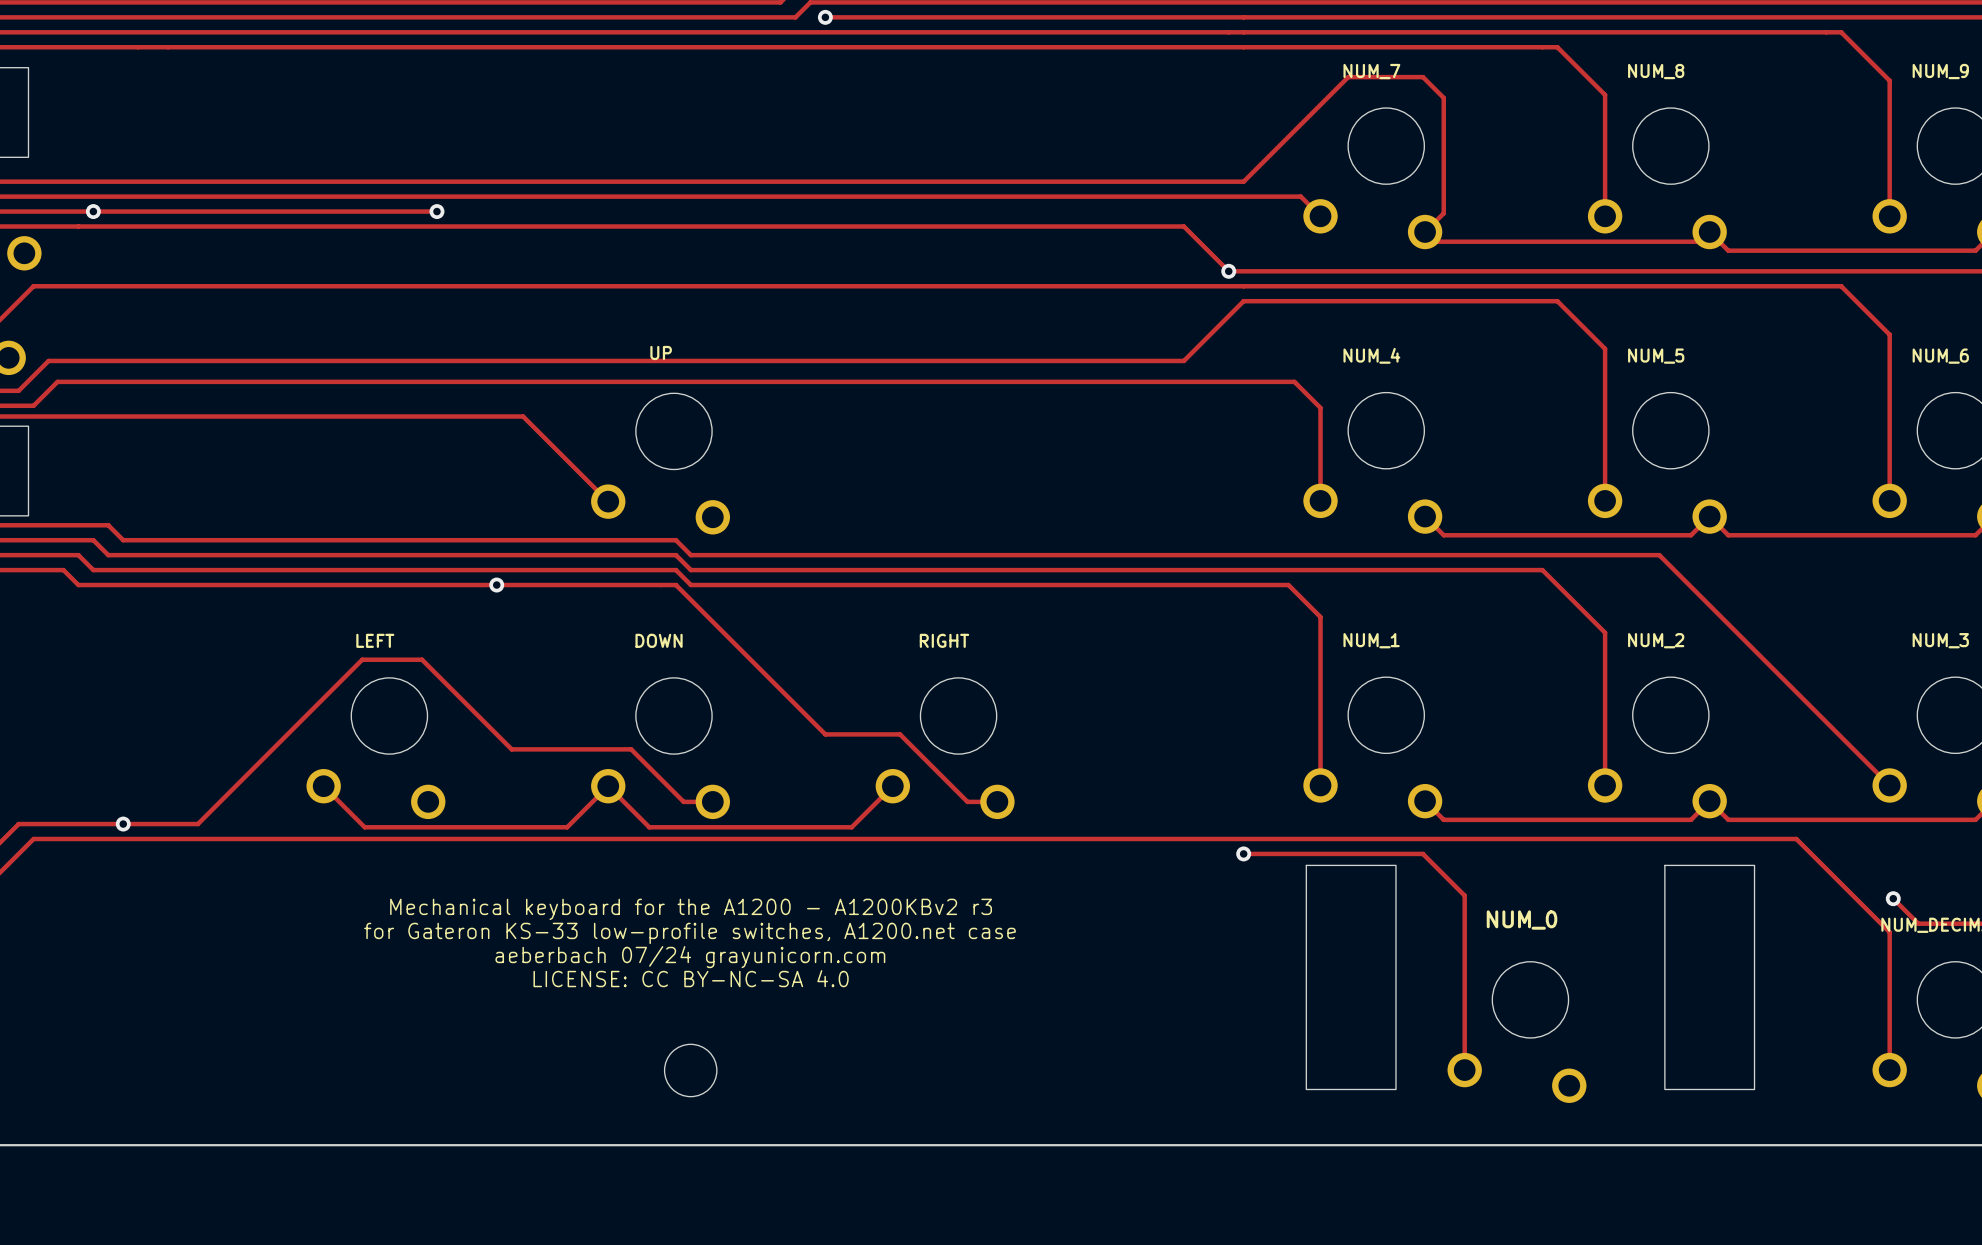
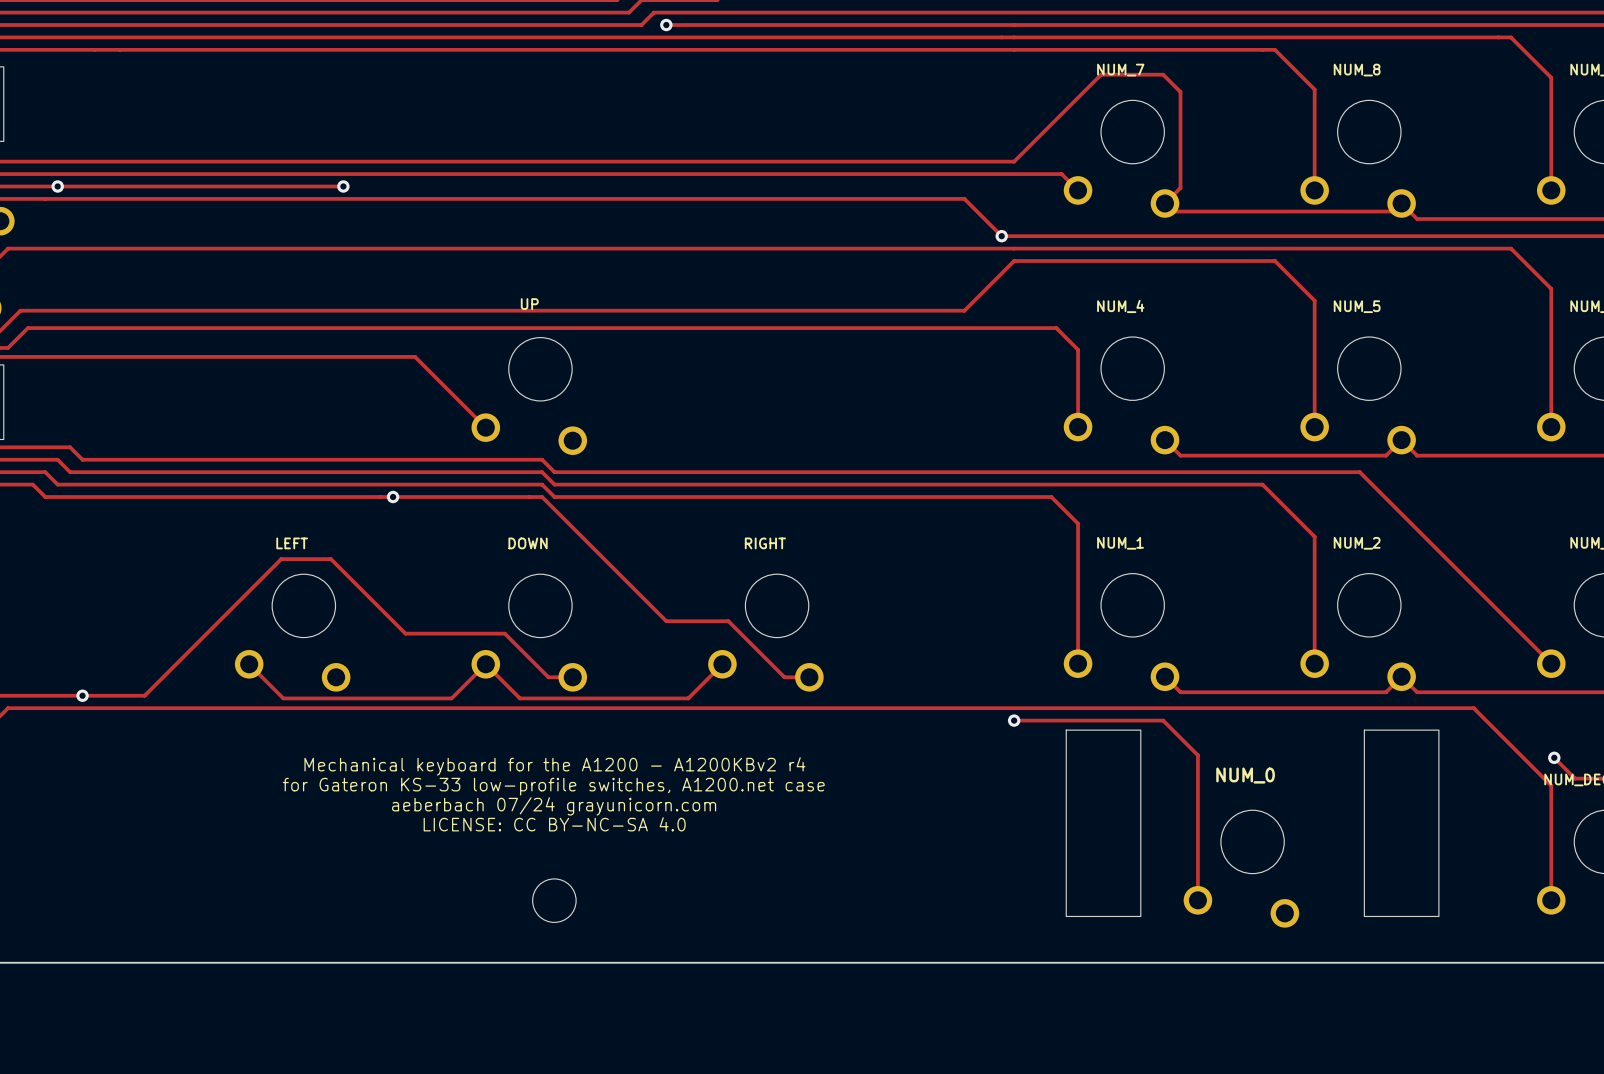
text: Mechanical keyboard for the A1200 - A1200KBv2 r3 (691, 909) -> Mechanical keyboard for the A1200 - A1200KBv2 r4 (554, 766)

